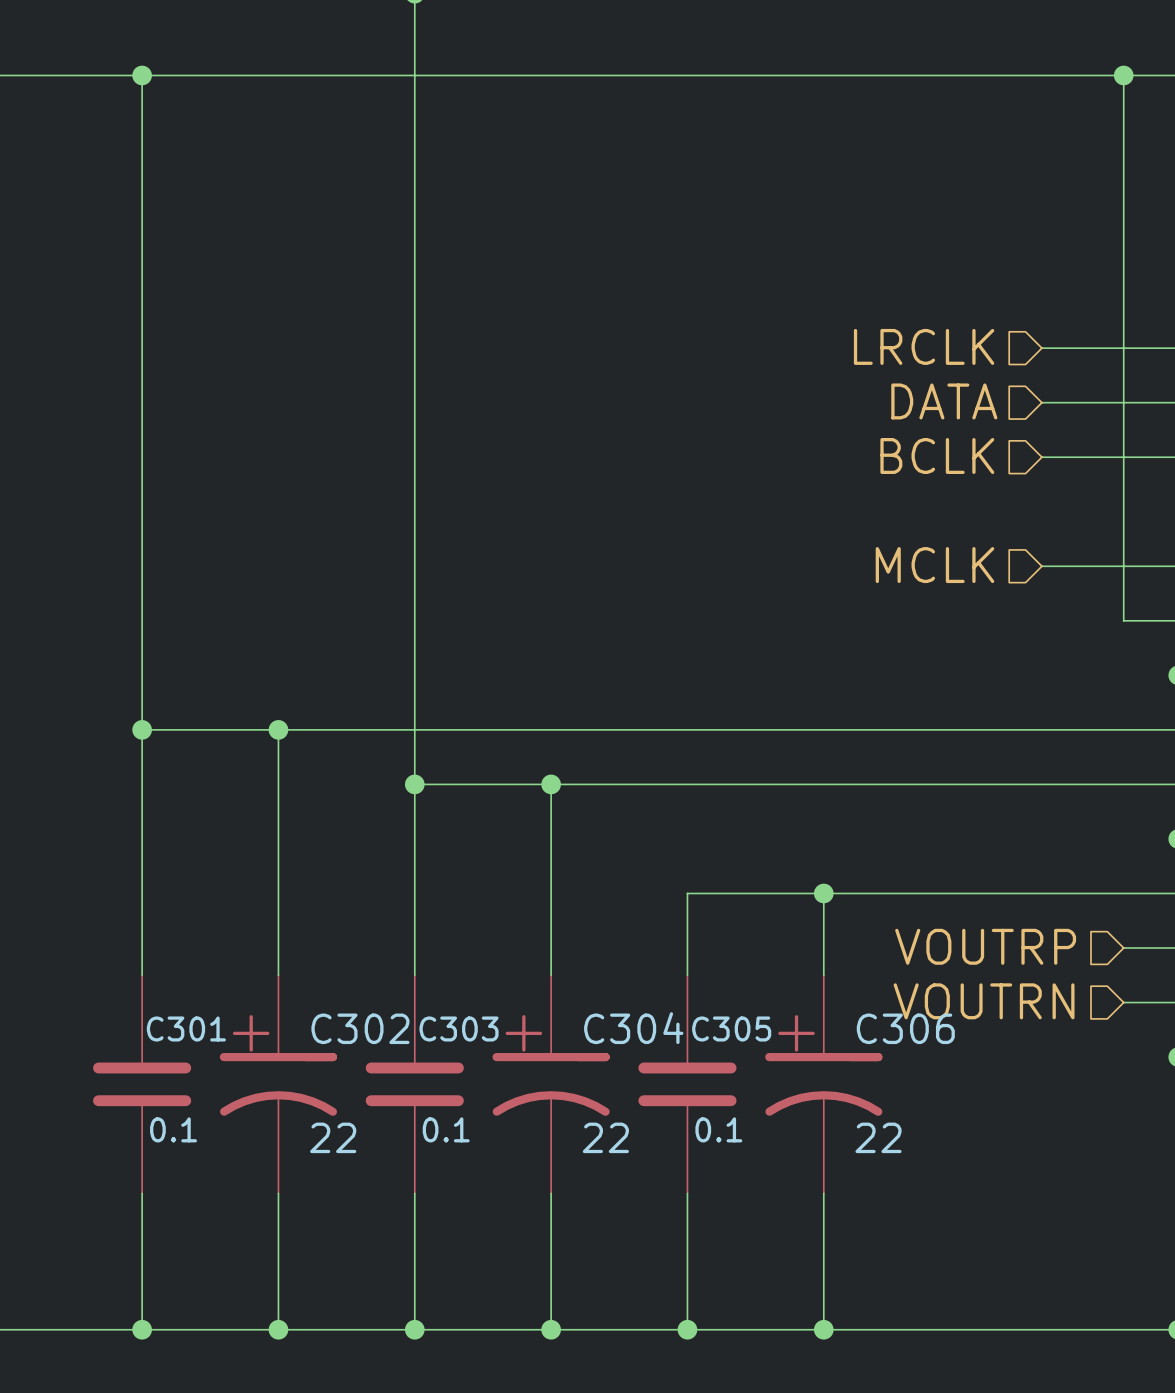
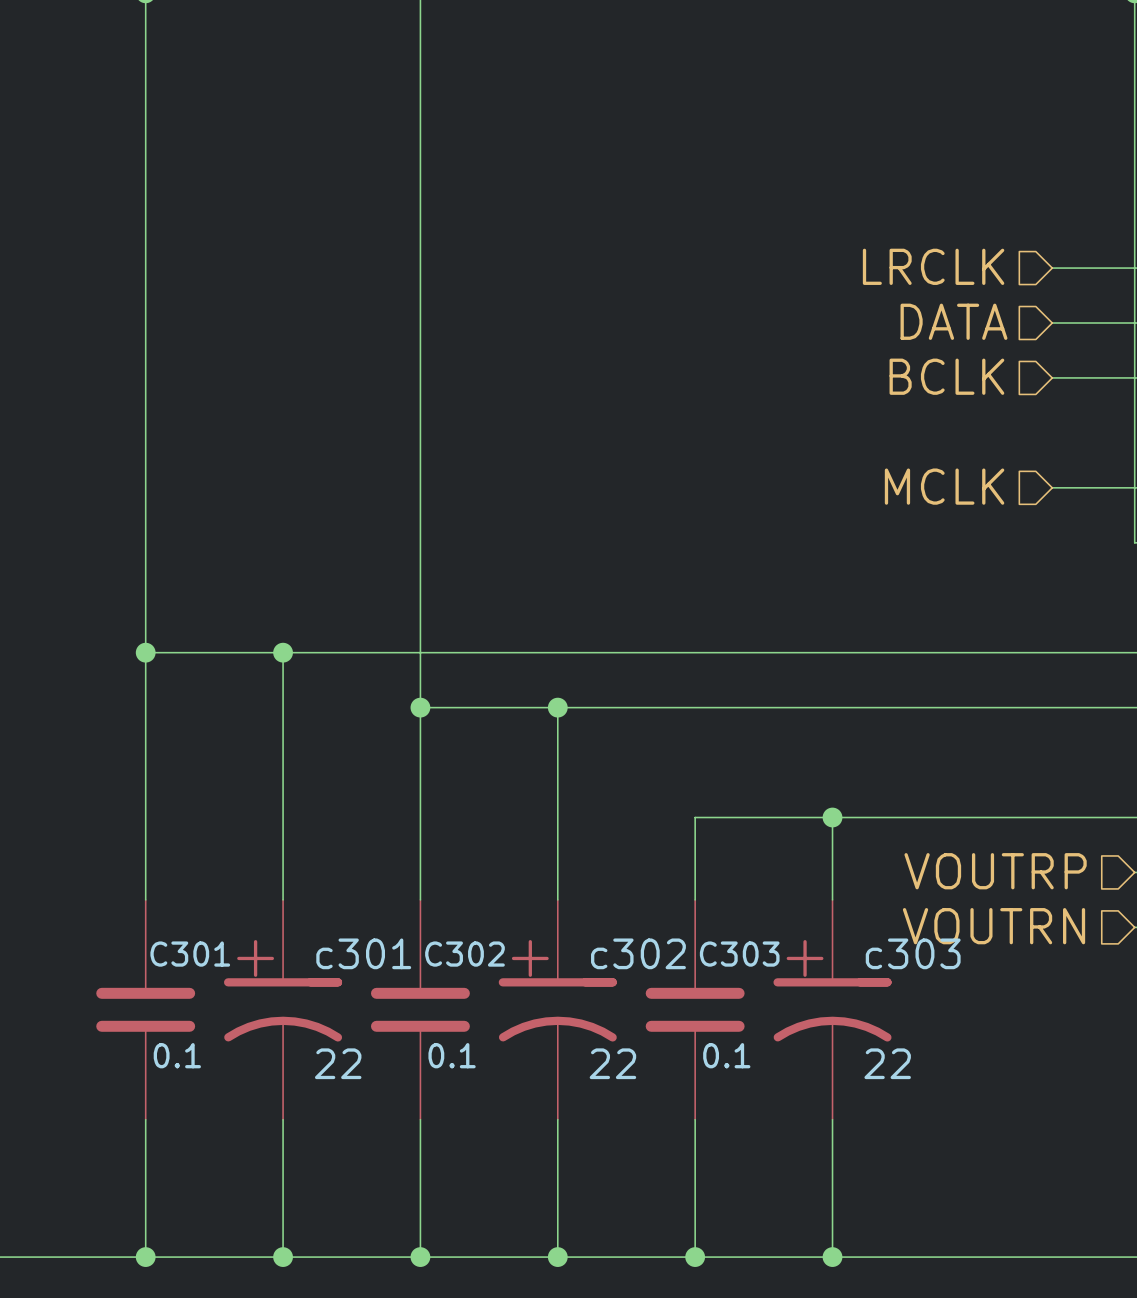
C302 name: C302 (360, 1028) -> c301 (363, 953)
C304 name: C304 (633, 1028) -> c302 (638, 953)
C306 name: C306 (905, 1028) -> c303 (913, 953)
C303 name: C303 (459, 1029) -> C302 (464, 954)
C305 name: C305 (731, 1029) -> C303 (739, 954)

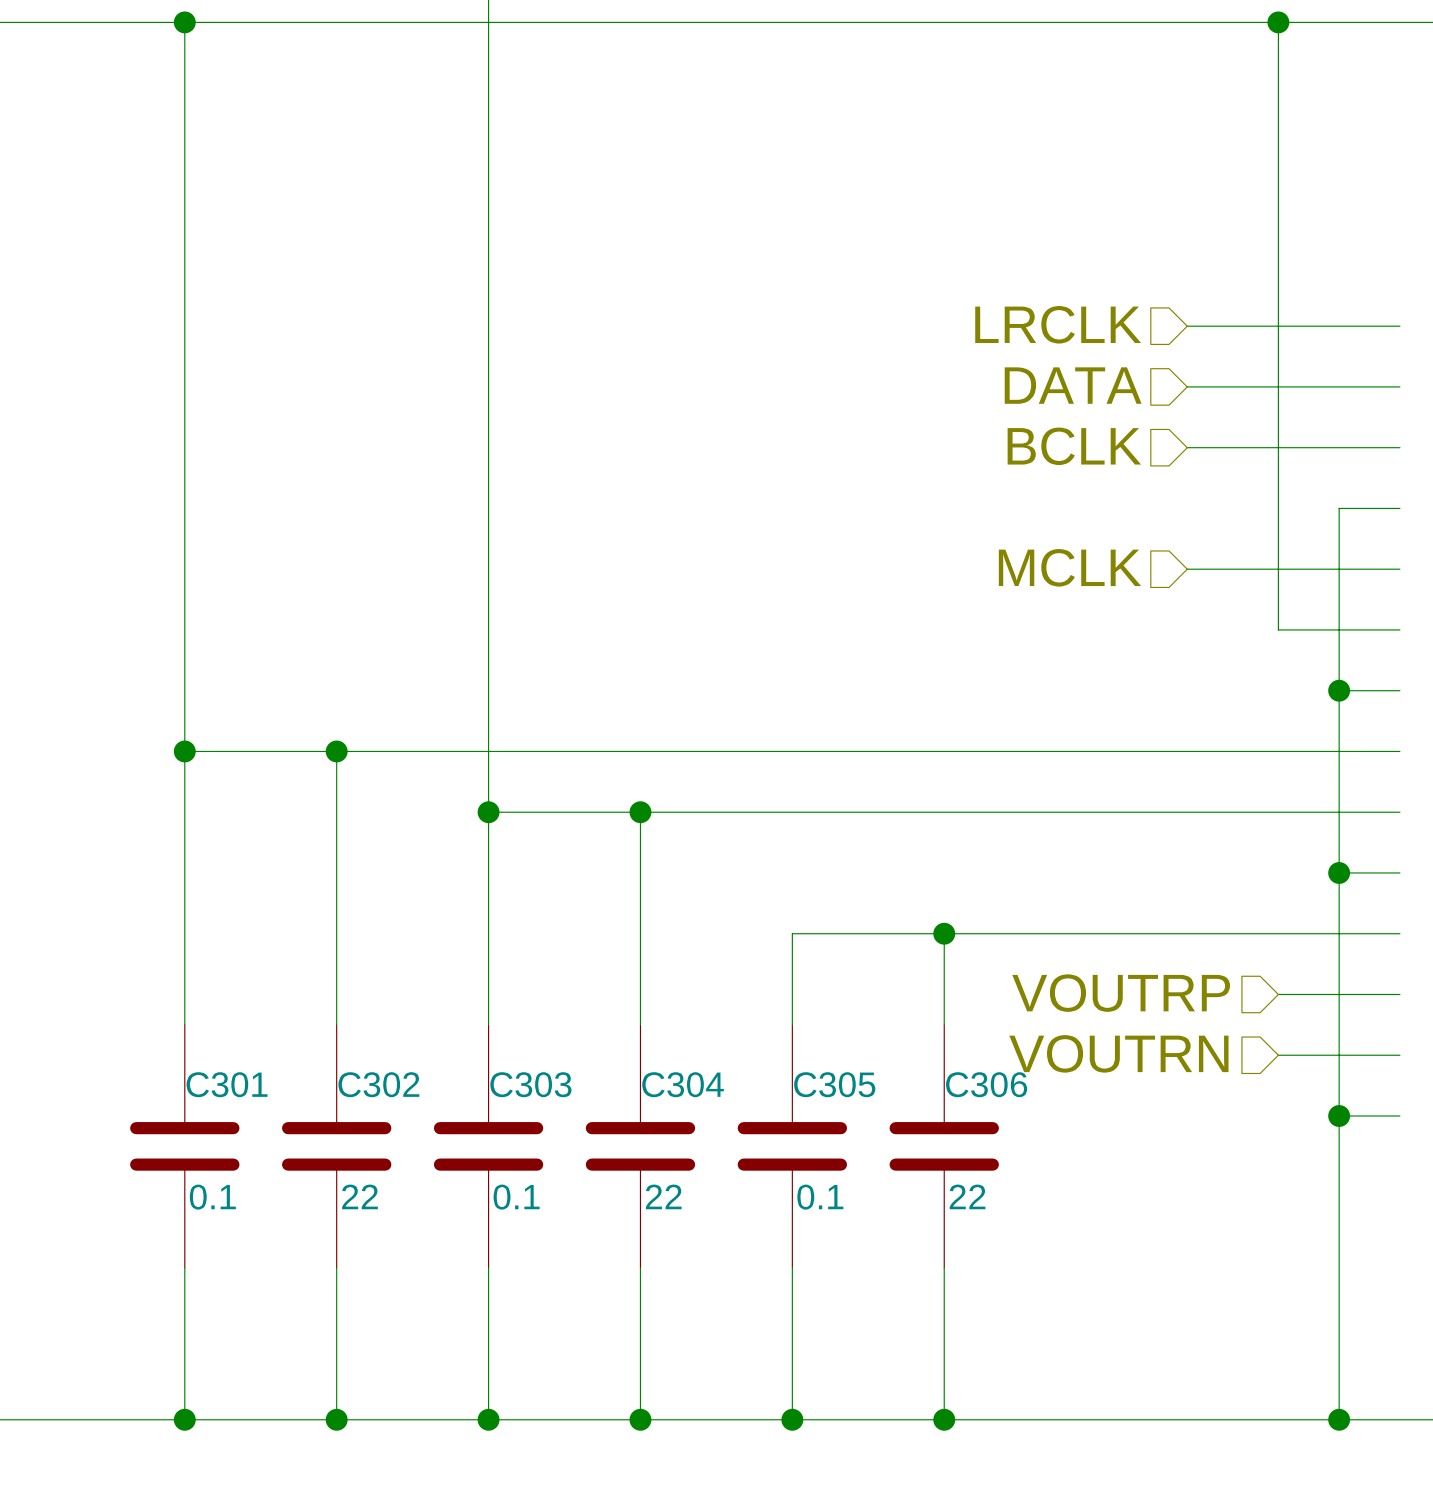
C302 name: C302 (464, 954) -> C303 (530, 1084)
C303 name: C303 (739, 954) -> C305 (834, 1084)
c301: 22 (283, 1009) -> none
C302: none -> 22 (336, 1146)
c302: 22 (557, 1009) -> none
C304: none -> 22 (640, 1146)
c303: 22 (832, 1009) -> none
C306: none -> 22 (944, 1146)

